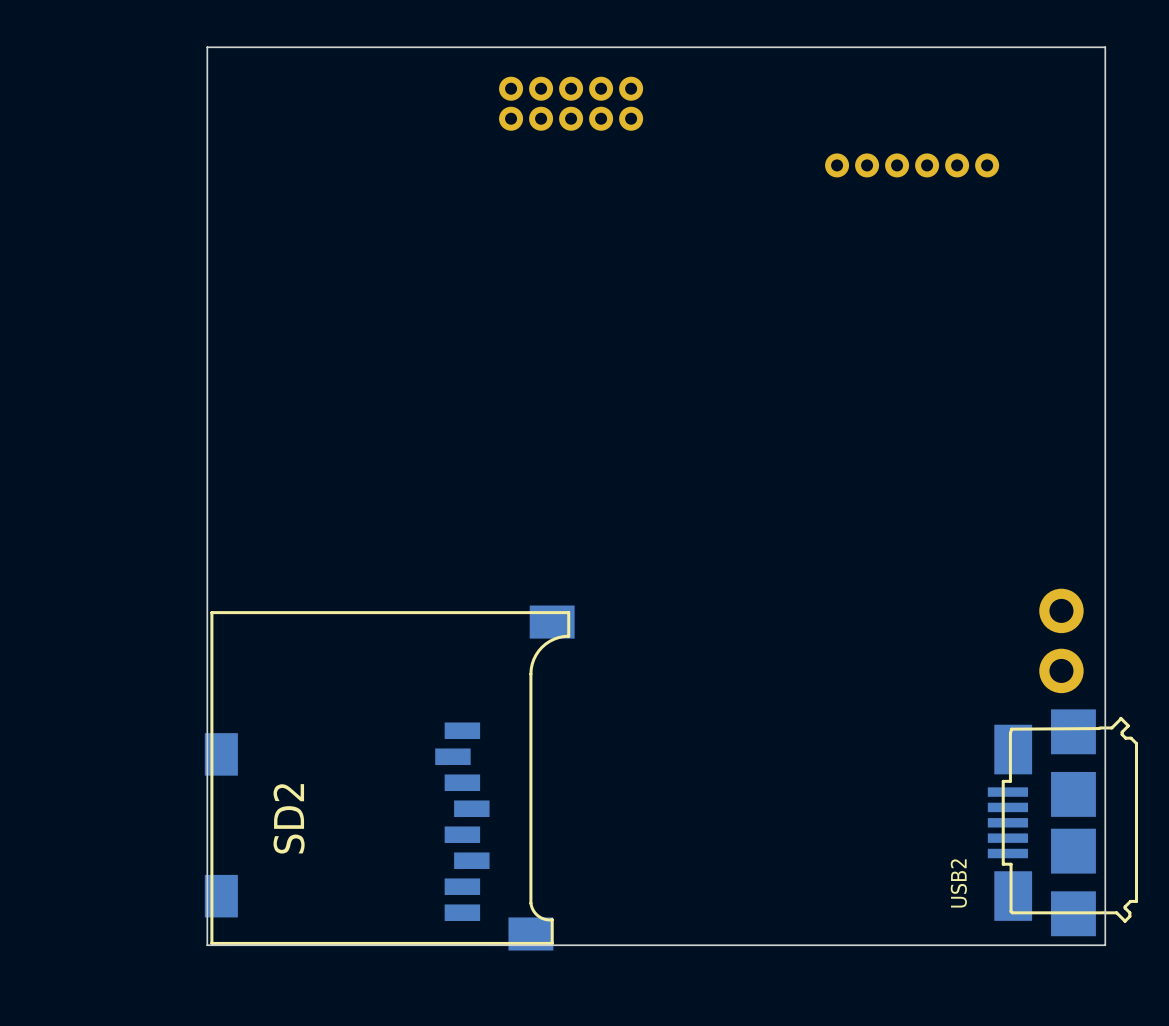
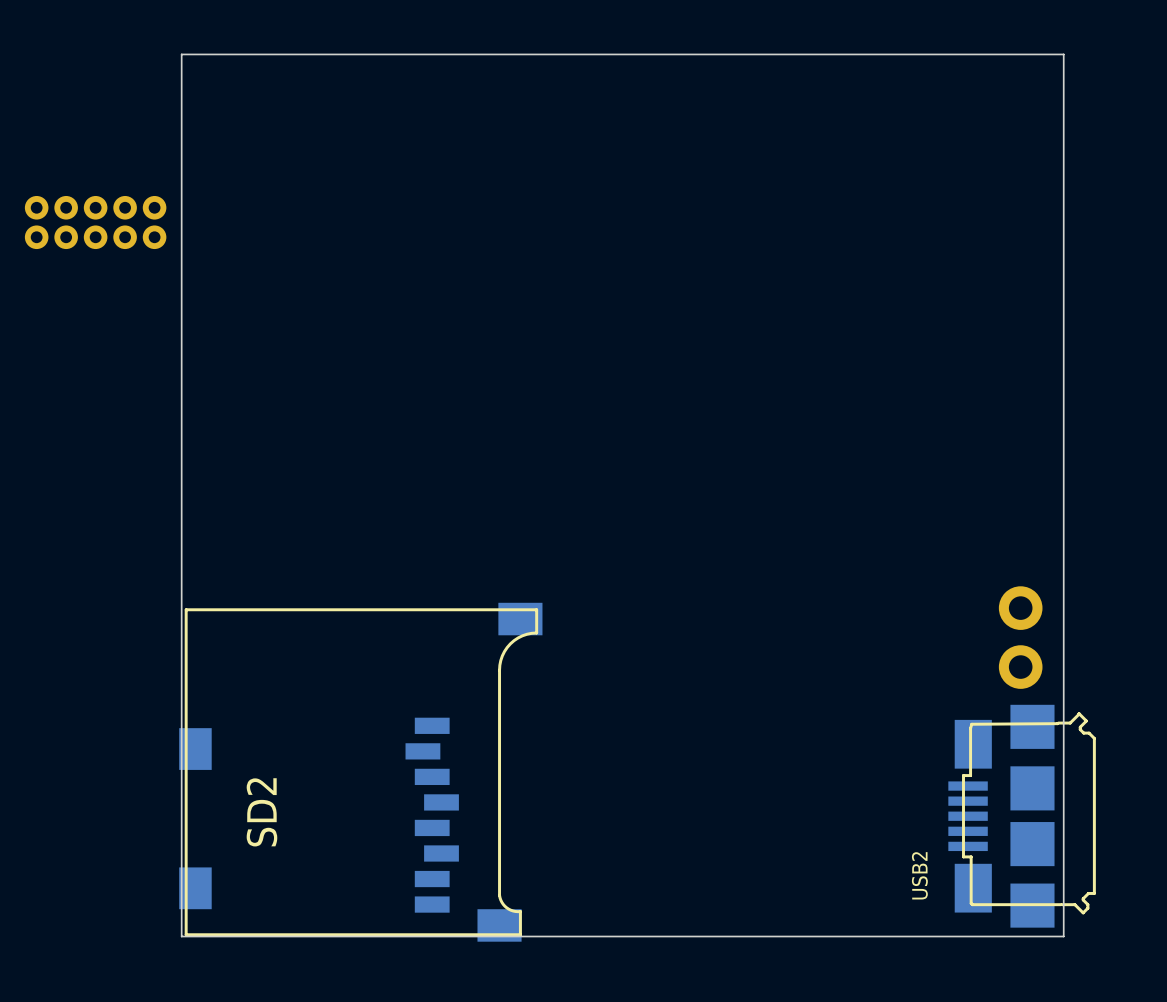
part position: (571, 103) -> (95, 222)
part: (912, 165) -> none

